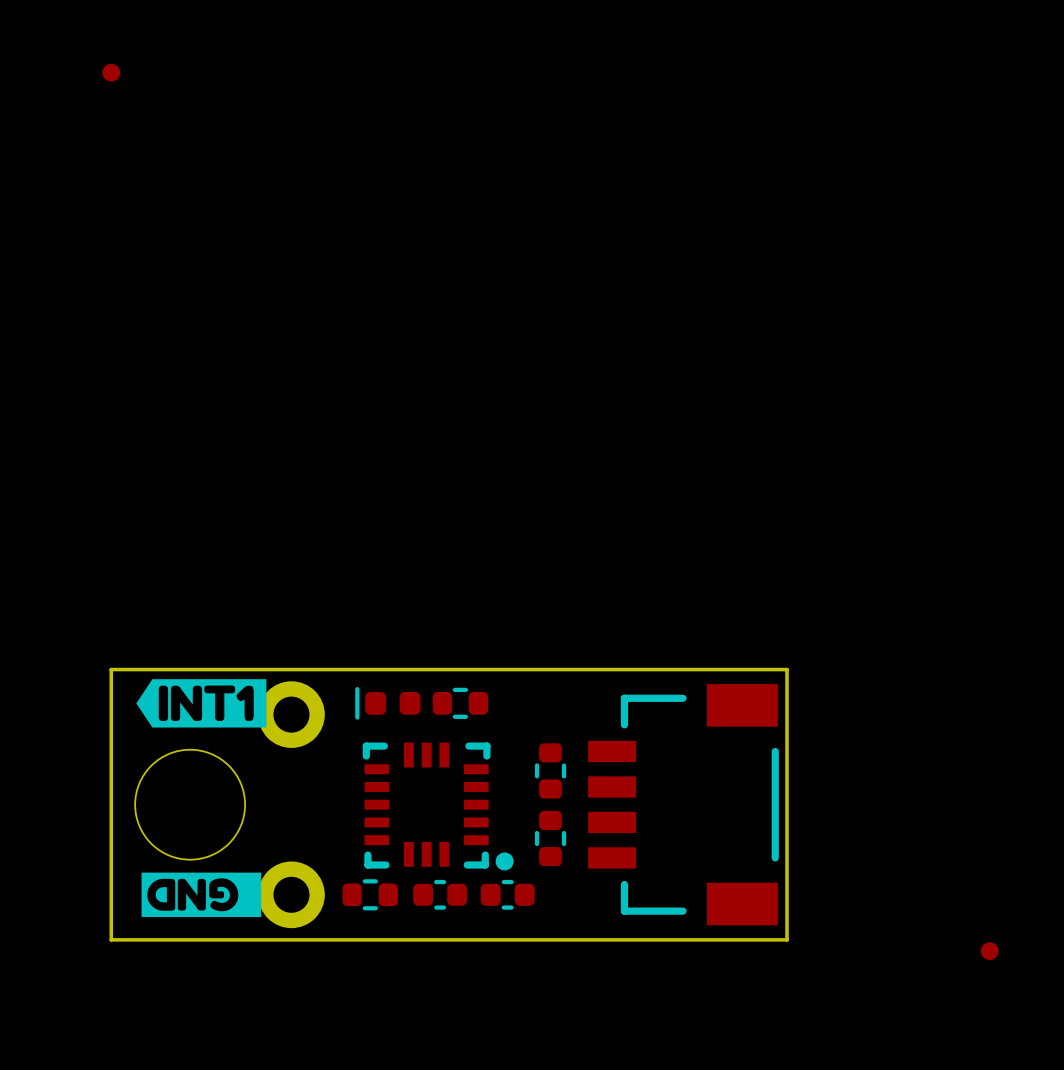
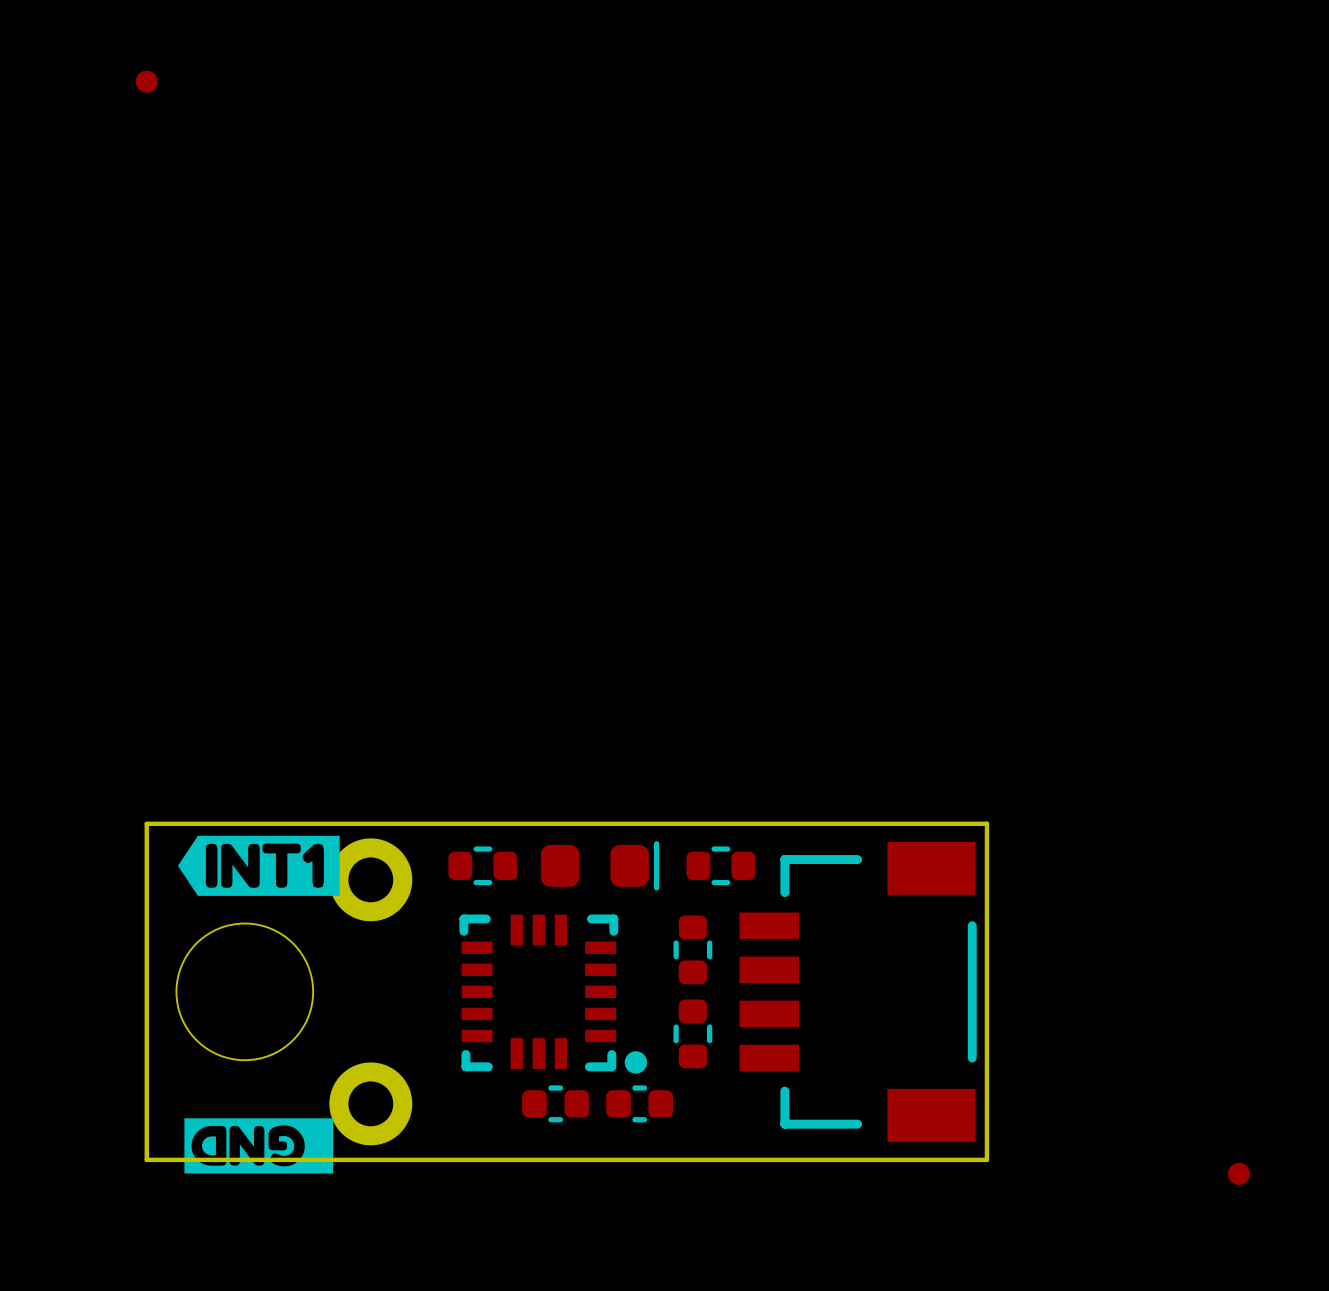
part footprint: [355, 687, 421, 720] -> [448, 846, 518, 886]
part footprint: [432, 687, 489, 719] -> [540, 841, 660, 891]
drawing position: (201, 894) -> (258, 1145)
part position: (370, 894) -> (720, 865)

